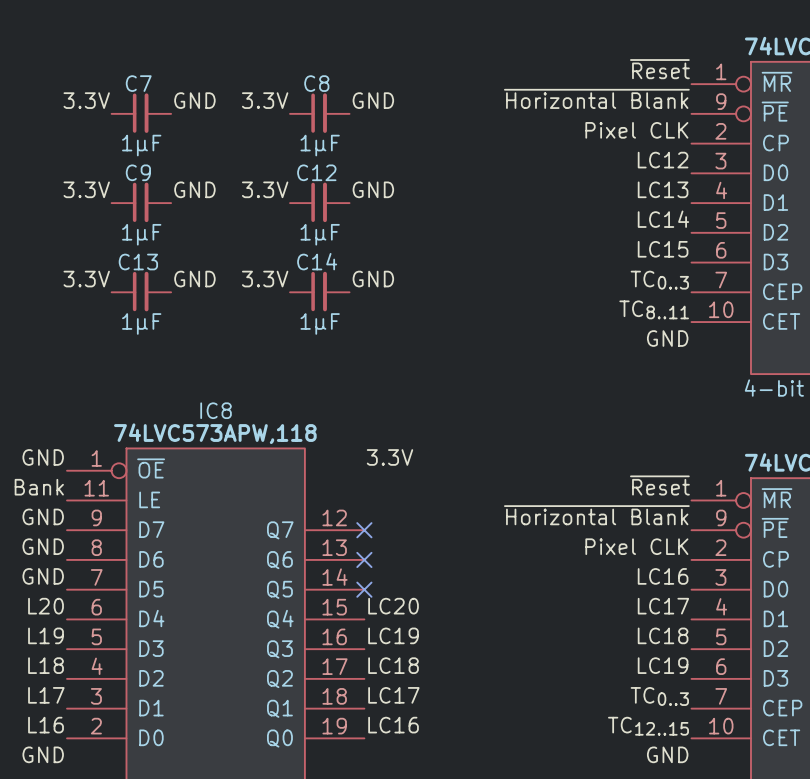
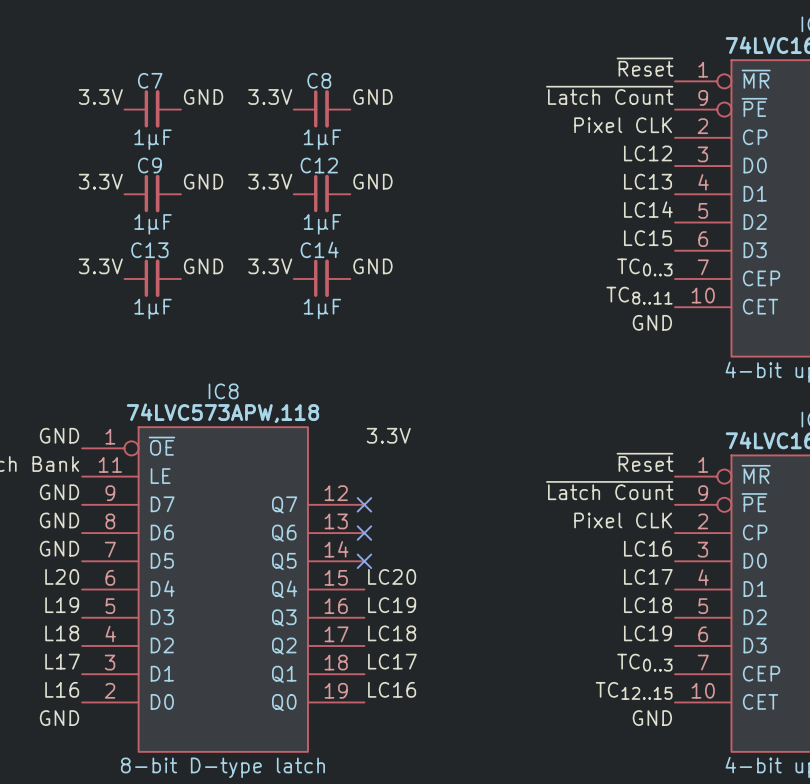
label: ~{Horizontal Blank} (596, 98) -> ~{Latch Count} (609, 95)
label: ~{Horizontal Blank} (596, 515) -> ~{Latch Count} (609, 490)

